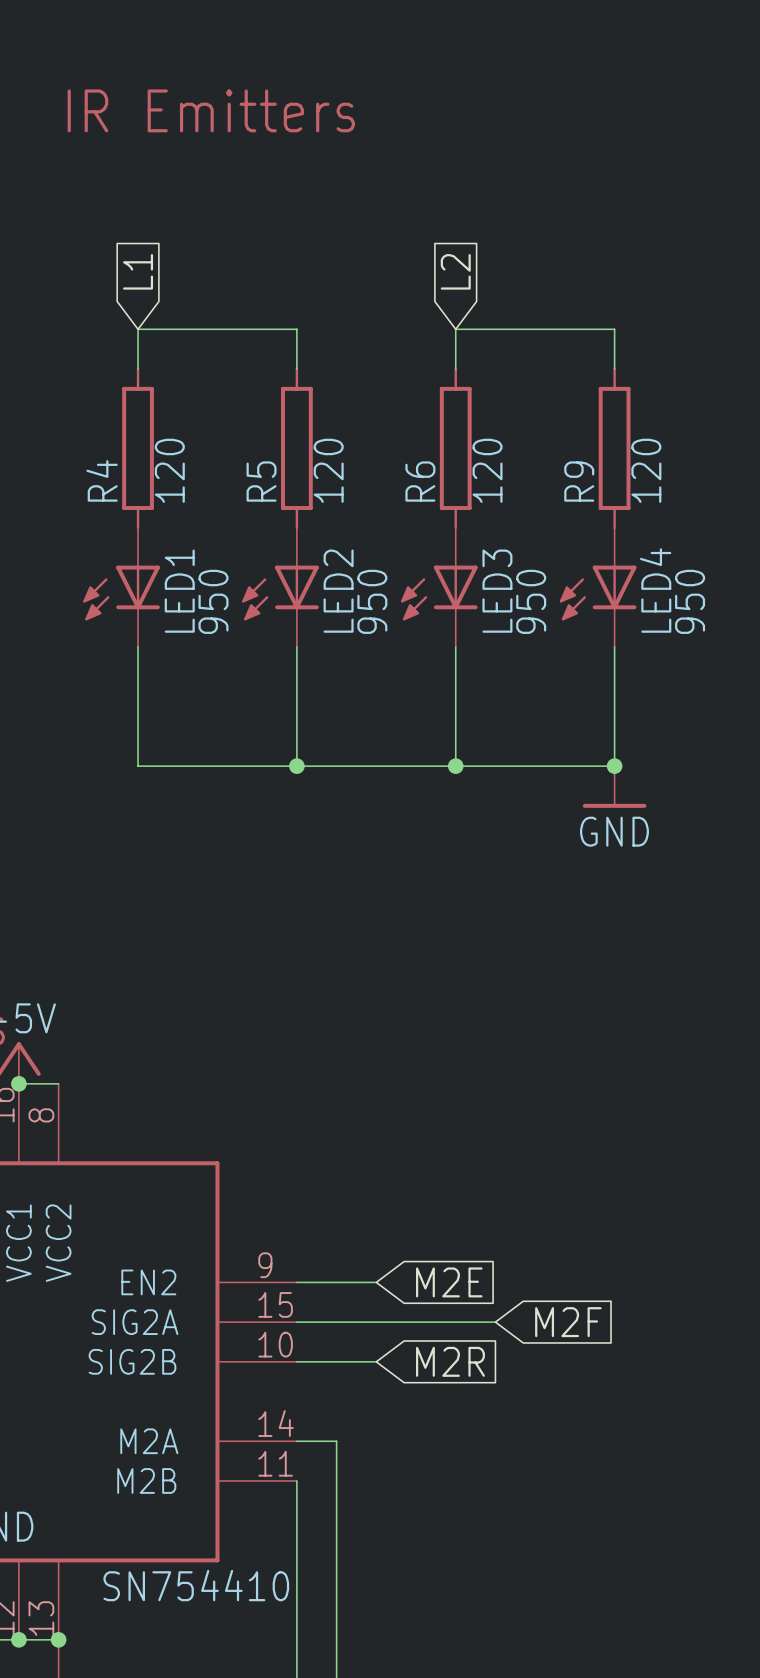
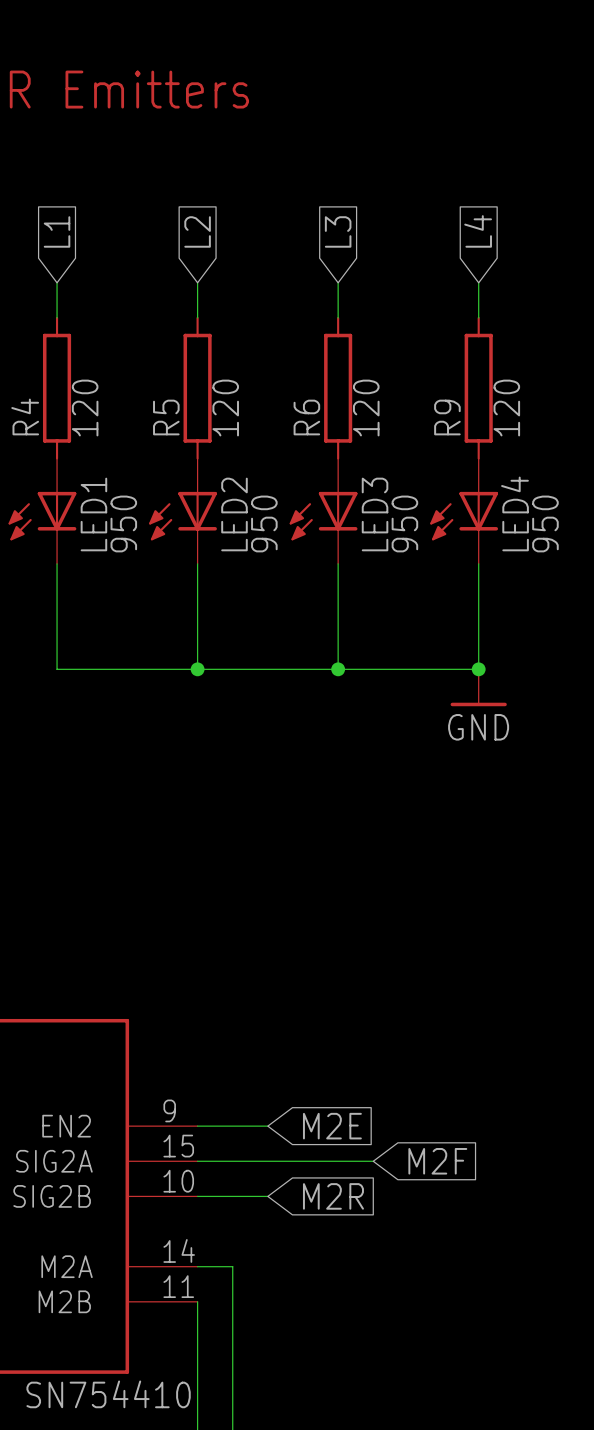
global label: none -> L2 (197, 231)
global label: L2 (455, 271) -> L3 (338, 231)
global label: none -> L4 (478, 231)
wire: (138, 329) (296, 329) -> none
wire: (455, 329) (614, 329) -> none

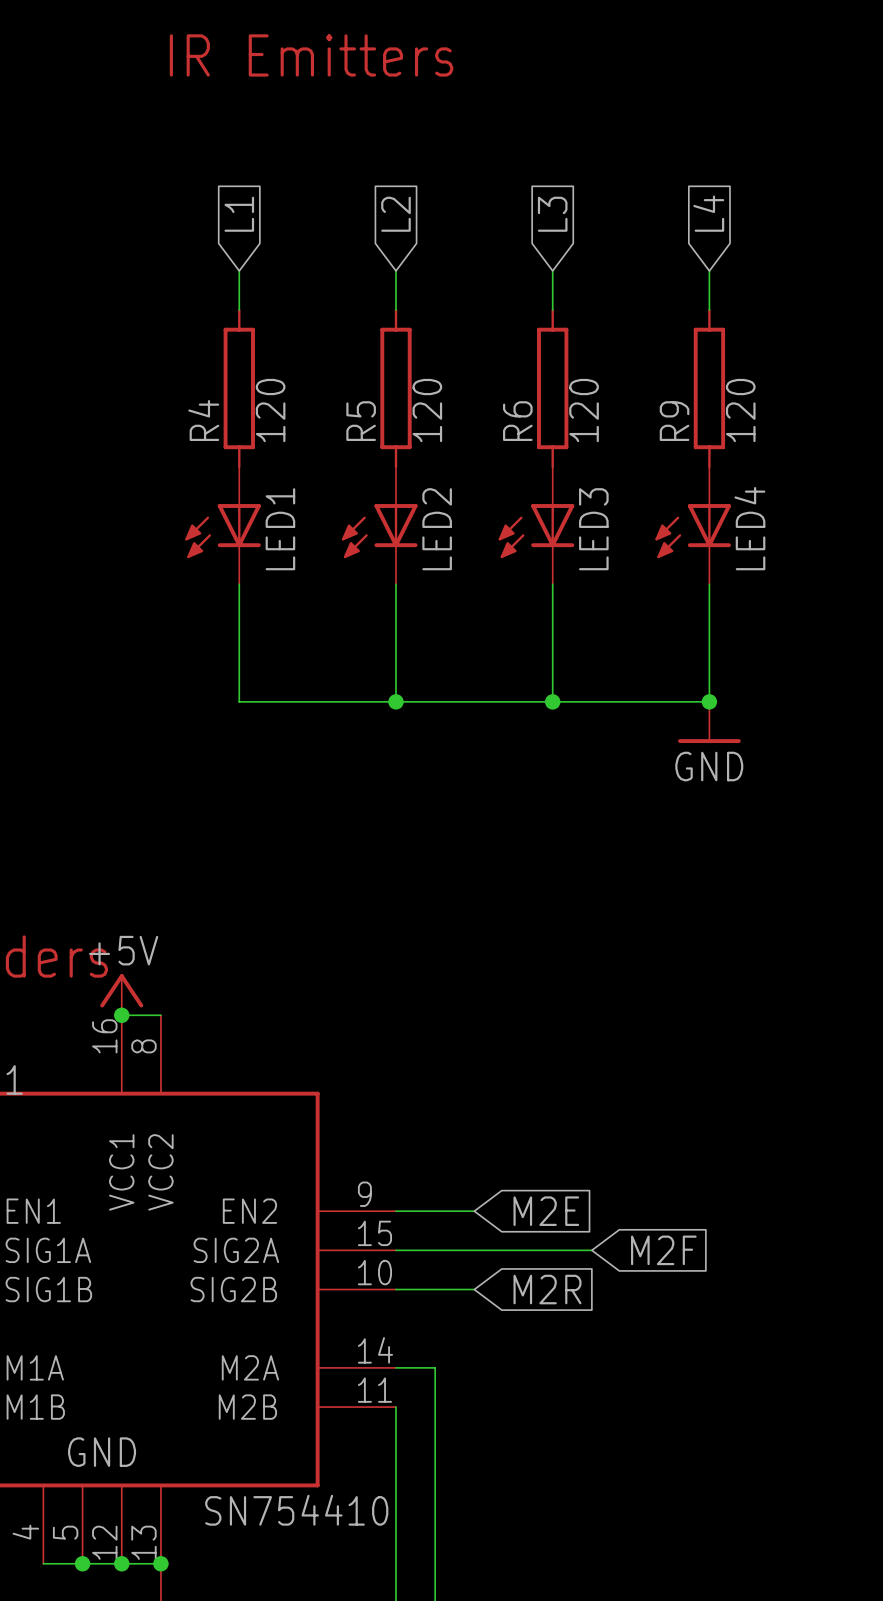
LED1 value: 950 (123, 523) -> none
LED2 value: 950 (264, 523) -> none
LED3 value: 950 (404, 523) -> none
LED4 value: 950 (545, 523) -> none

